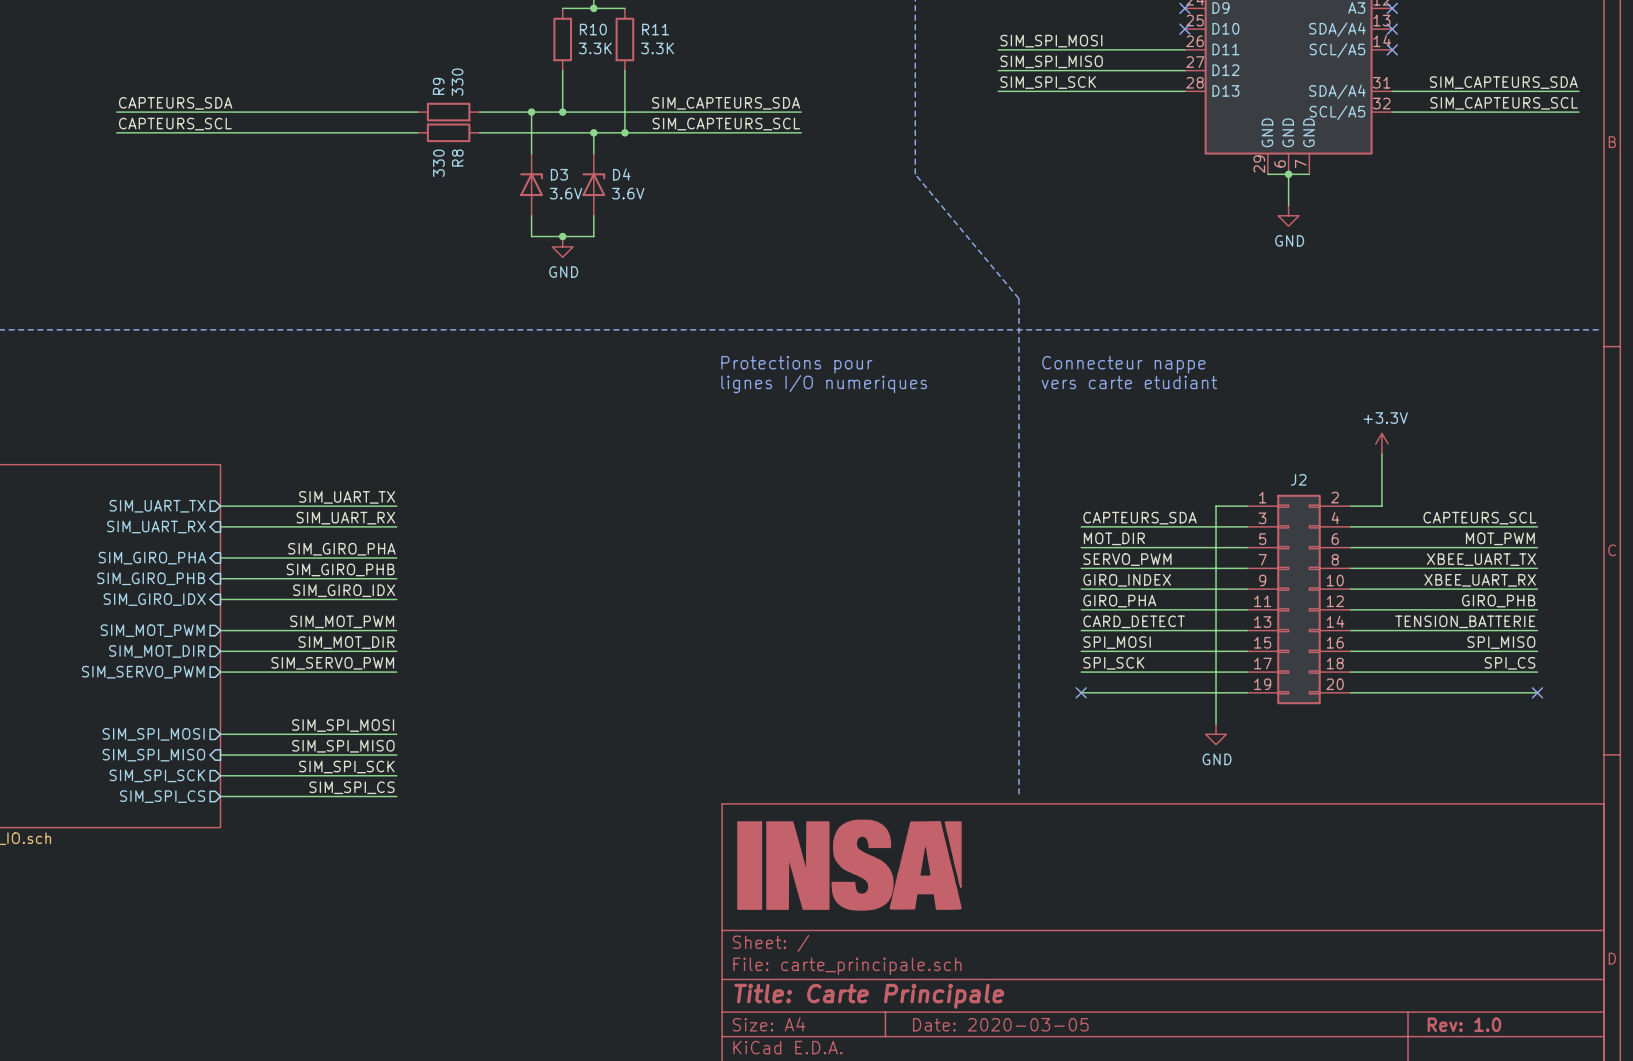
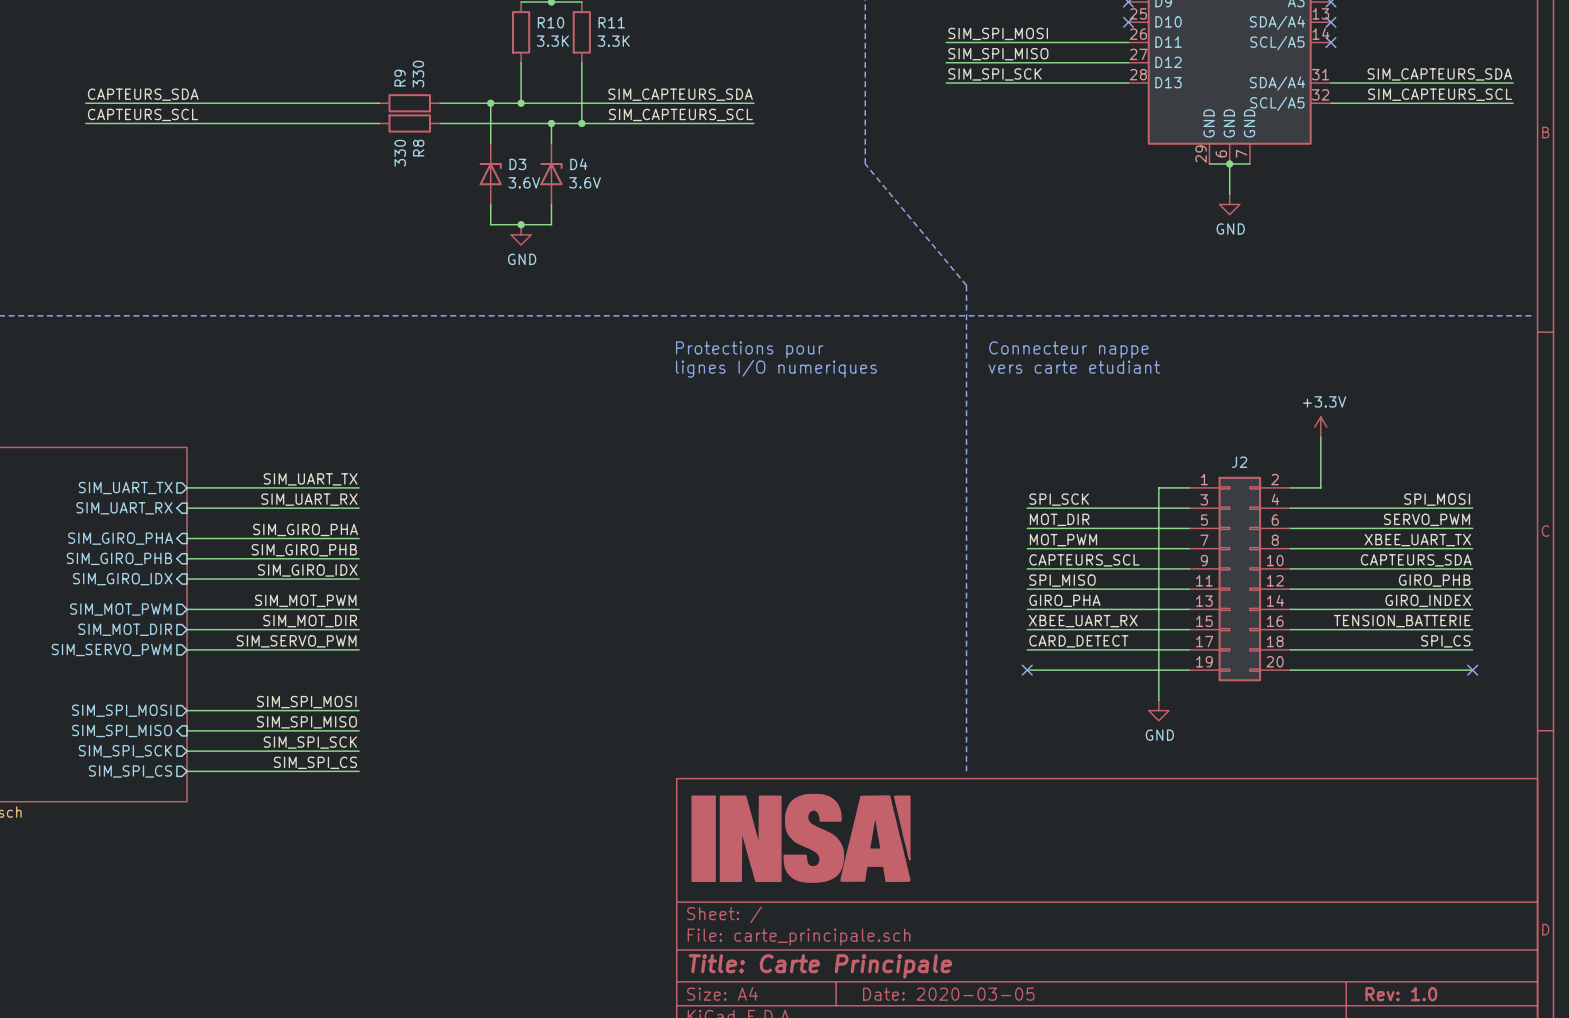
label: CAPTEURS_SDA (1140, 518) -> SPI_SCK (1059, 499)
label: CAPTEURS_SCL (1479, 518) -> SPI_MOSI (1437, 499)
label: MOT_PWM (1500, 538) -> SERVO_PWM (1427, 519)
label: SERVO_PWM (1127, 559) -> MOT_PWM (1063, 540)
label: GIRO_INDEX (1127, 580) -> CAPTEURS_SCL (1084, 560)
label: XBEE_UART_RX (1480, 580) -> CAPTEURS_SDA (1416, 560)
label: GIRO_PHA (1119, 601) -> SPI_MISO (1062, 580)
label: CARD_DETECT (1134, 621) -> GIRO_PHA (1064, 600)
label: TENSION_BATTERIE (1465, 621) -> GIRO_INDEX (1428, 600)
label: SPI_MOSI (1117, 642) -> XBEE_UART_RX (1083, 621)
label: SPI_MISO (1501, 642) -> TENSION_BATTERIE (1402, 621)
label: SPI_SCK (1113, 663) -> CARD_DETECT (1078, 641)

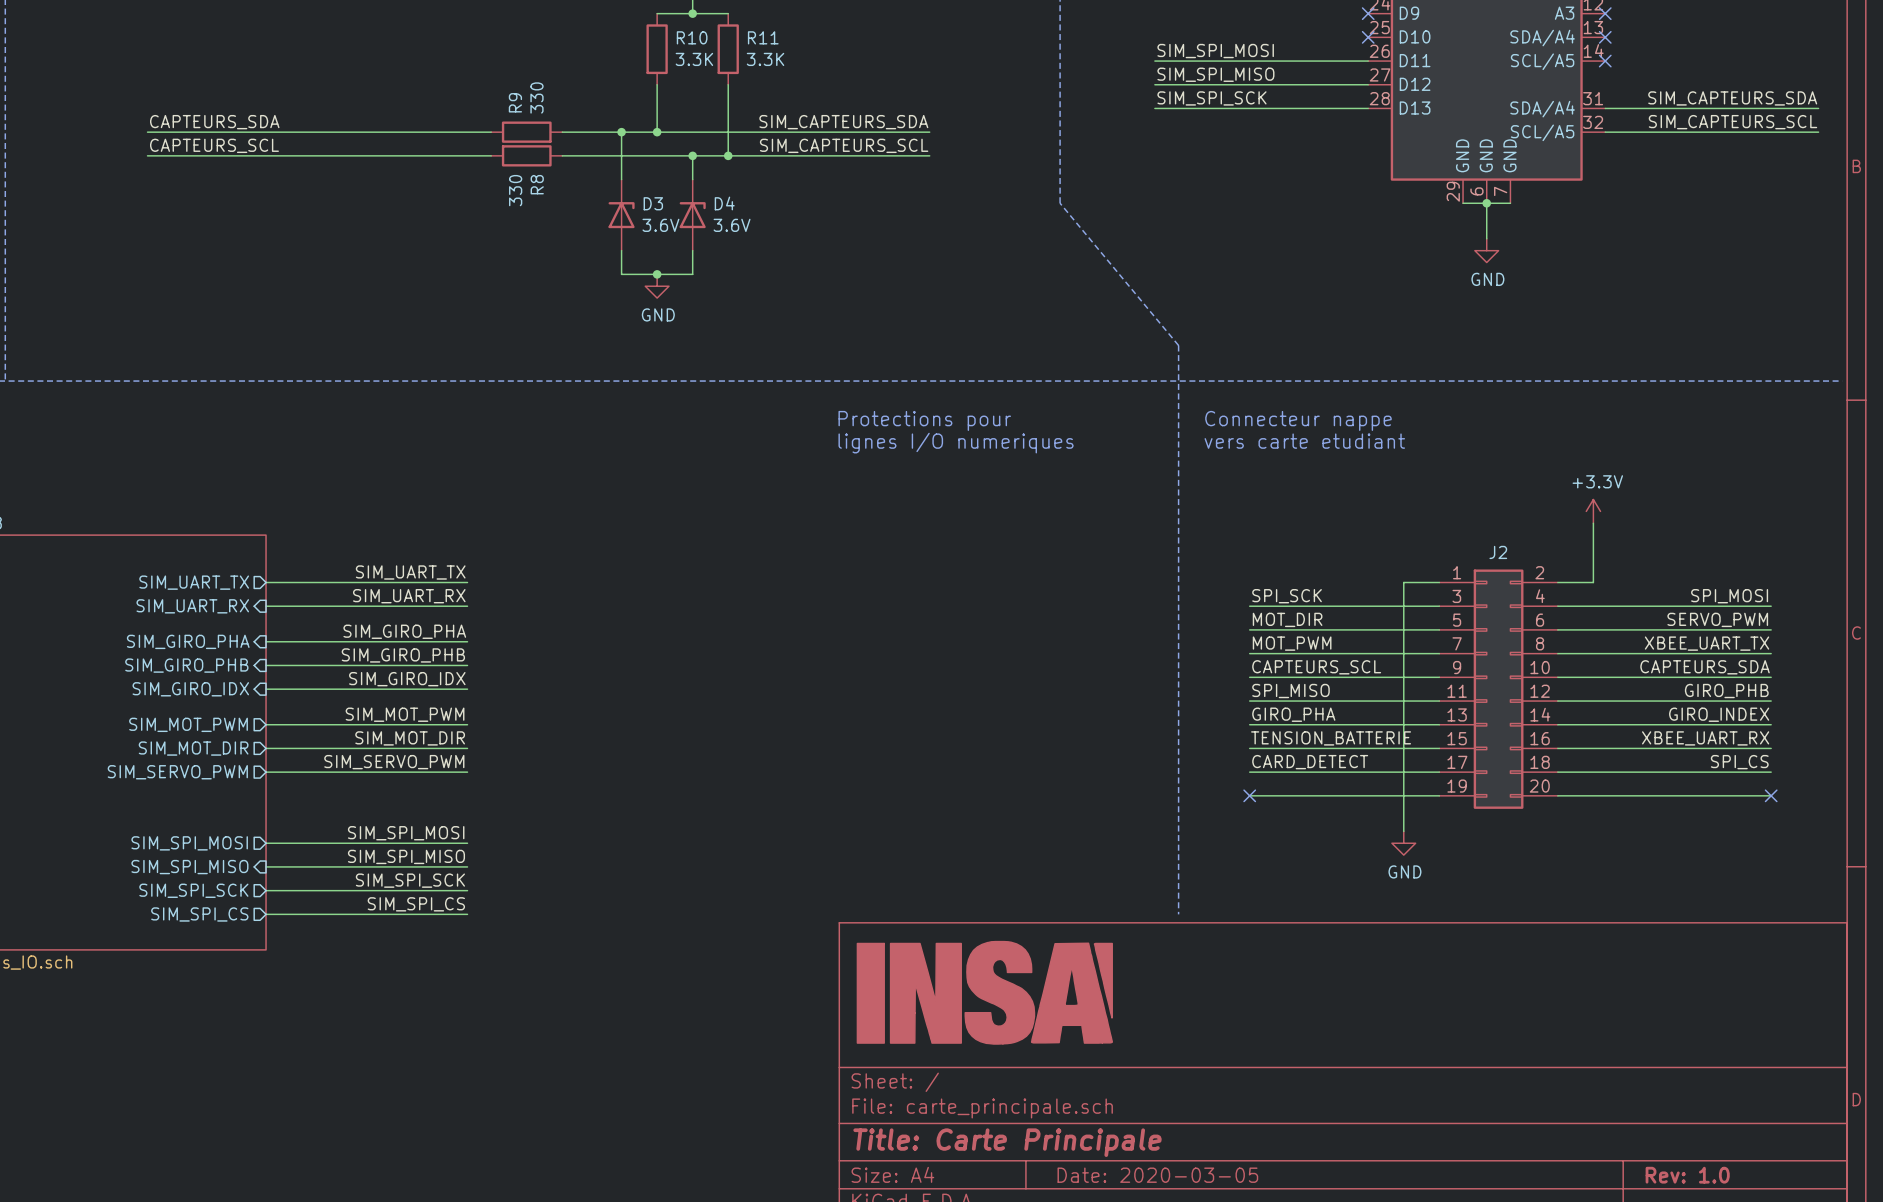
label: XBEE_UART_RX (1083, 621) -> TENSION_BATTERIE (1331, 738)
label: TENSION_BATTERIE (1402, 621) -> XBEE_UART_RX (1705, 738)

